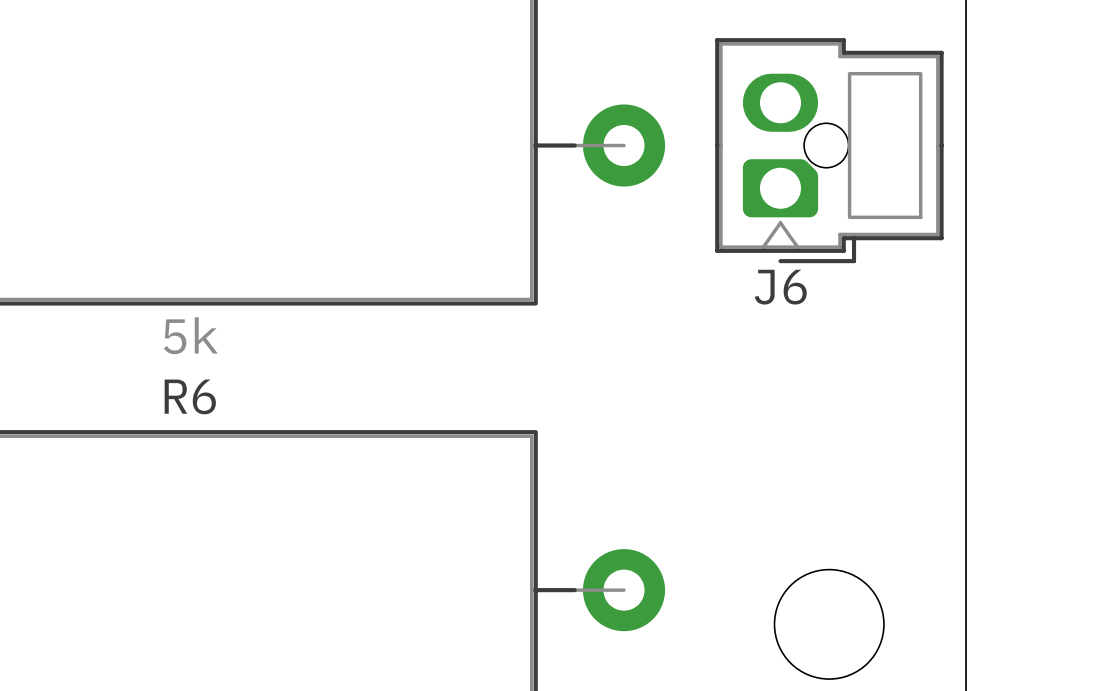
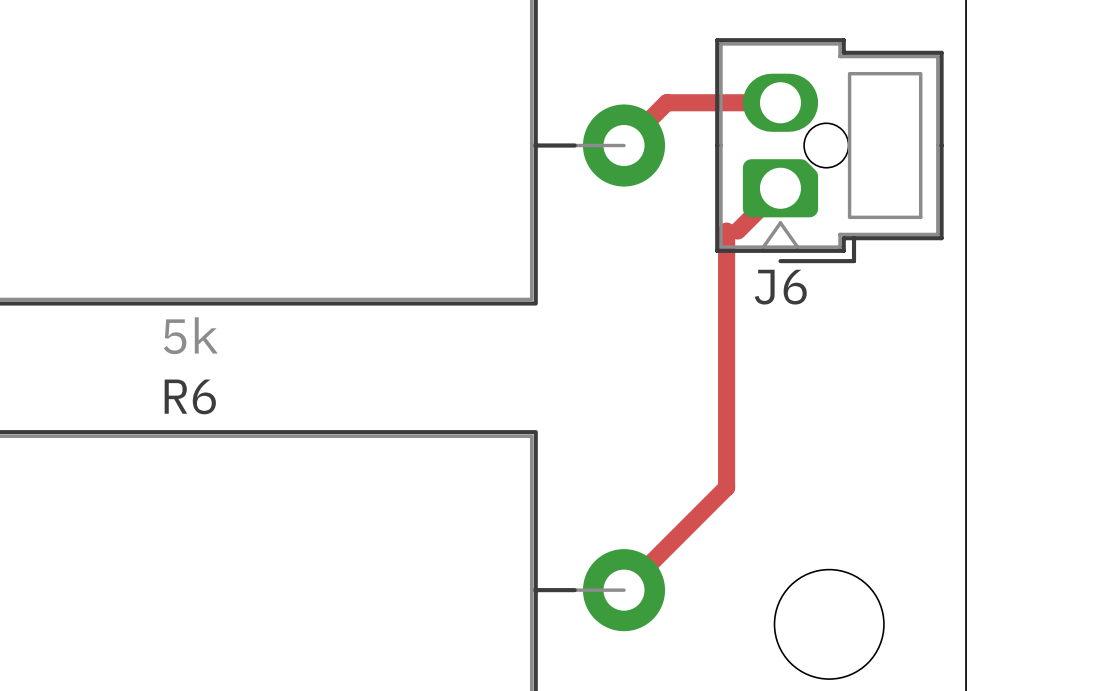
track: none -> (780, 102) (666, 102) (624, 145)
track: none -> (780, 188) (737, 231) (726, 231) (726, 487) (624, 590)

